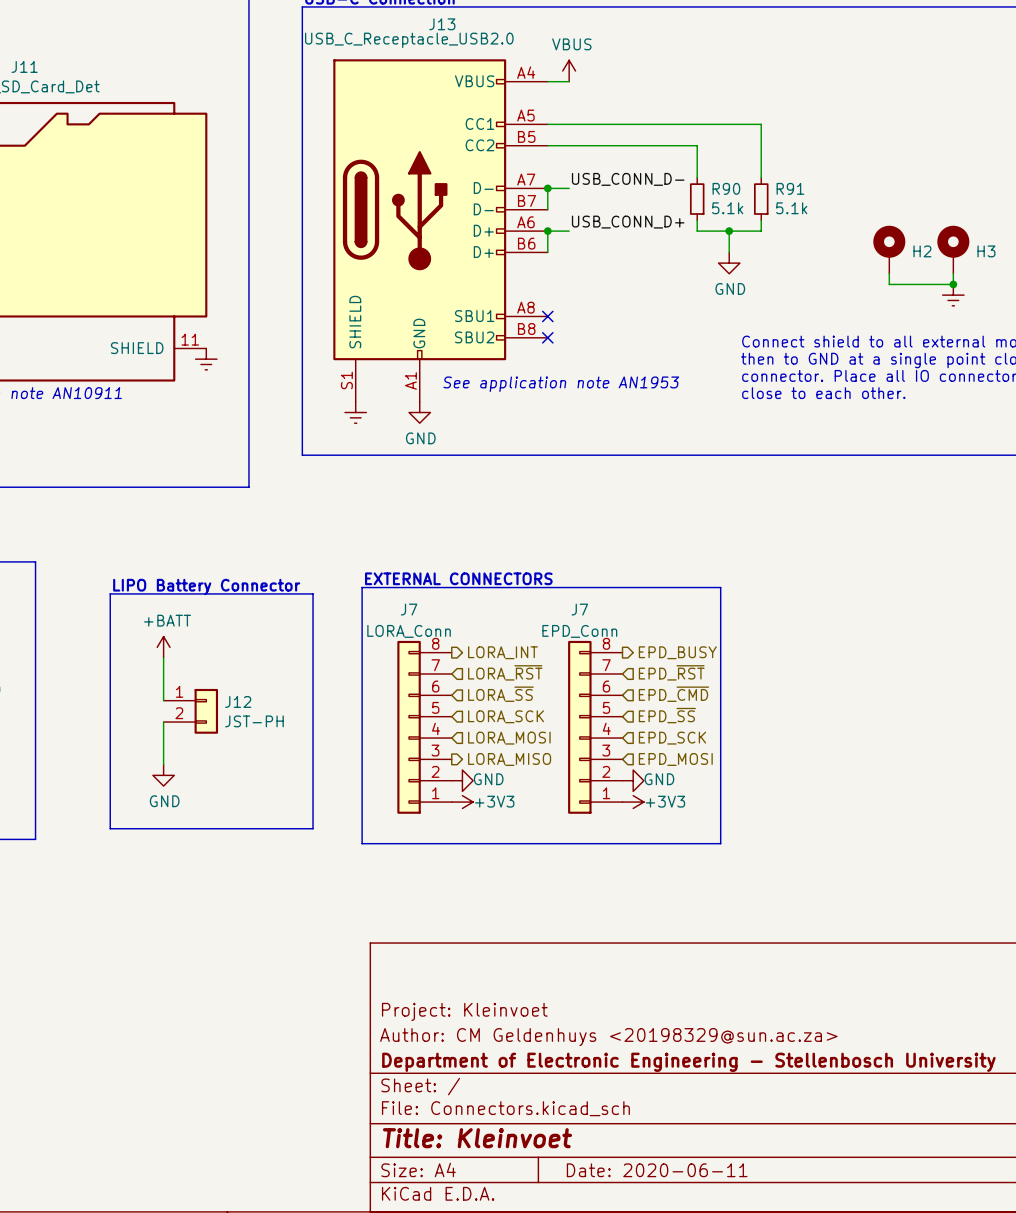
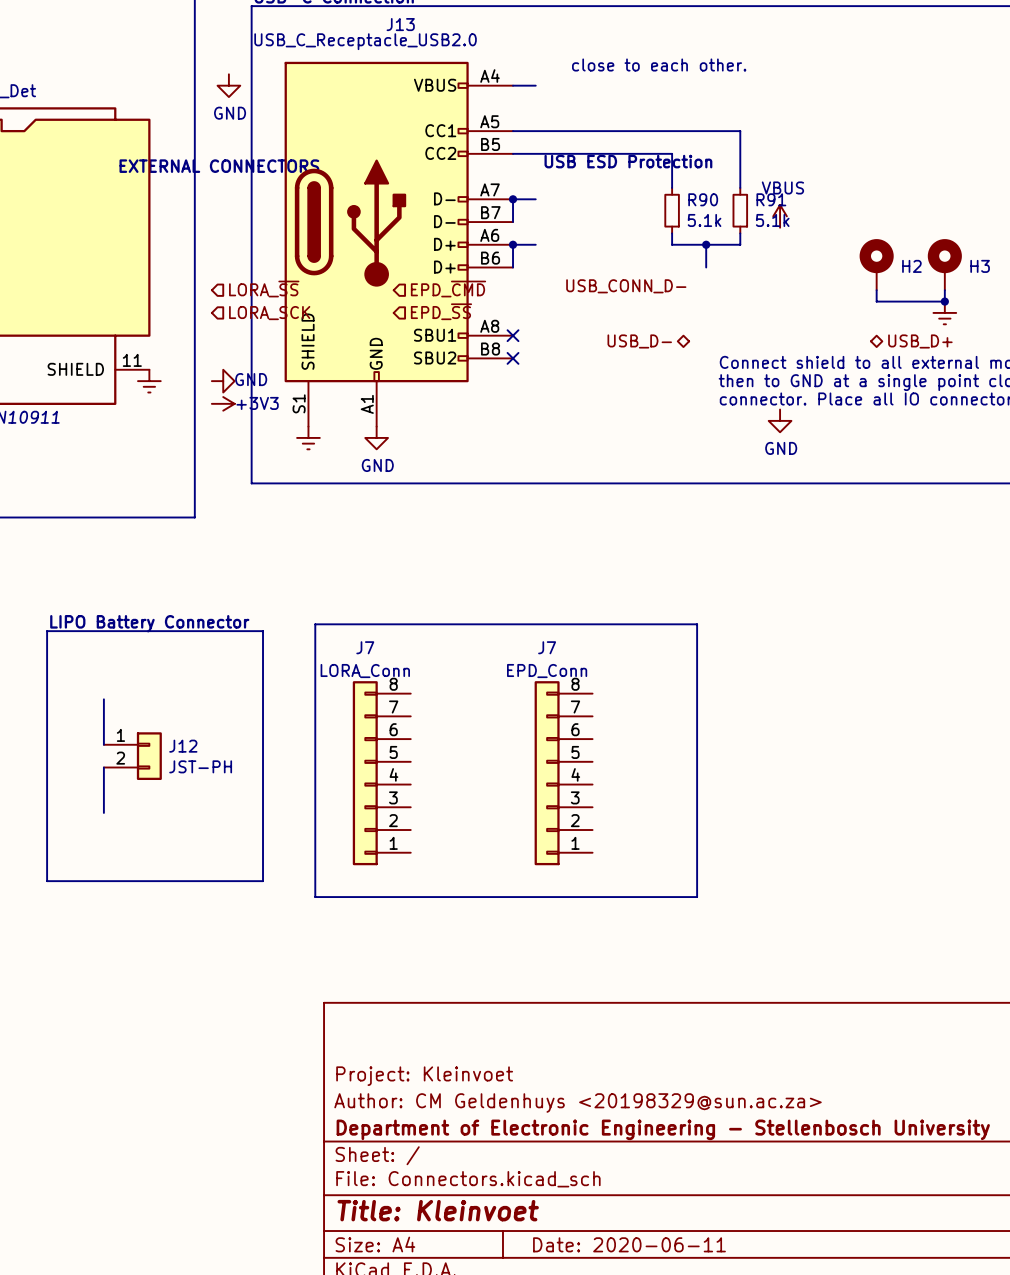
text: none -> close to each other. (659, 64)
power symbol: VBUS (569, 71) -> none
power symbol: none -> GND (228, 85)
text: none -> USB ESD Protection (628, 161)
text: none -> EXTERNAL CONNECTORS (219, 166)
label position: USB_CONN_D- (628, 179) -> USB_CONN_D- (626, 286)
power symbol: none -> VBUS (780, 216)
label: USB_CONN_D+ (628, 222) -> none
power symbol position: GND (729, 263) -> GND (780, 420)
hierarchical label: none -> LORA_~{SS} (264, 289)
hierarchical label: none -> EPD_~{CMD} (448, 289)
hierarchical label: none -> EPD_~{SS} (441, 311)
hierarchical label: none -> LORA_SCK (269, 313)
hierarchical label: none -> USB_D- (639, 341)
hierarchical label: none -> USB_D+ (920, 341)
power symbol: none -> GND (223, 381)
power symbol: none -> +3V3 (223, 403)
text: See application note AN1953 (561, 384) -> none
text: close to each other. (823, 393) -> none
text: EXTERNAL CONNECTORS (458, 578) -> none
power symbol: +BATT (163, 647) -> none
hierarchical label: LORA_INT (502, 652) -> none
hierarchical label: EPD_BUSY (677, 652) -> none
hierarchical label: LORA_~{RST} (505, 672) -> none
hierarchical label: EPD_~{RST} (671, 672) -> none
hierarchical label: LORA_~{SS} (500, 694) -> none
hierarchical label: EPD_~{CMD} (673, 694) -> none
hierarchical label: EPD_~{SS} (667, 715) -> none
hierarchical label: LORA_SCK (506, 716) -> none
hierarchical label: LORA_MOSI (509, 738) -> none
hierarchical label: EPD_SCK (672, 738) -> none
hierarchical label: LORA_MISO (509, 759) -> none
hierarchical label: EPD_MOSI (675, 759) -> none
power symbol: GND (163, 775) -> none
power symbol: GND (462, 780) -> none
power symbol: GND (633, 780) -> none
power symbol: +3V3 (462, 802) -> none
power symbol: +3V3 (633, 802) -> none

